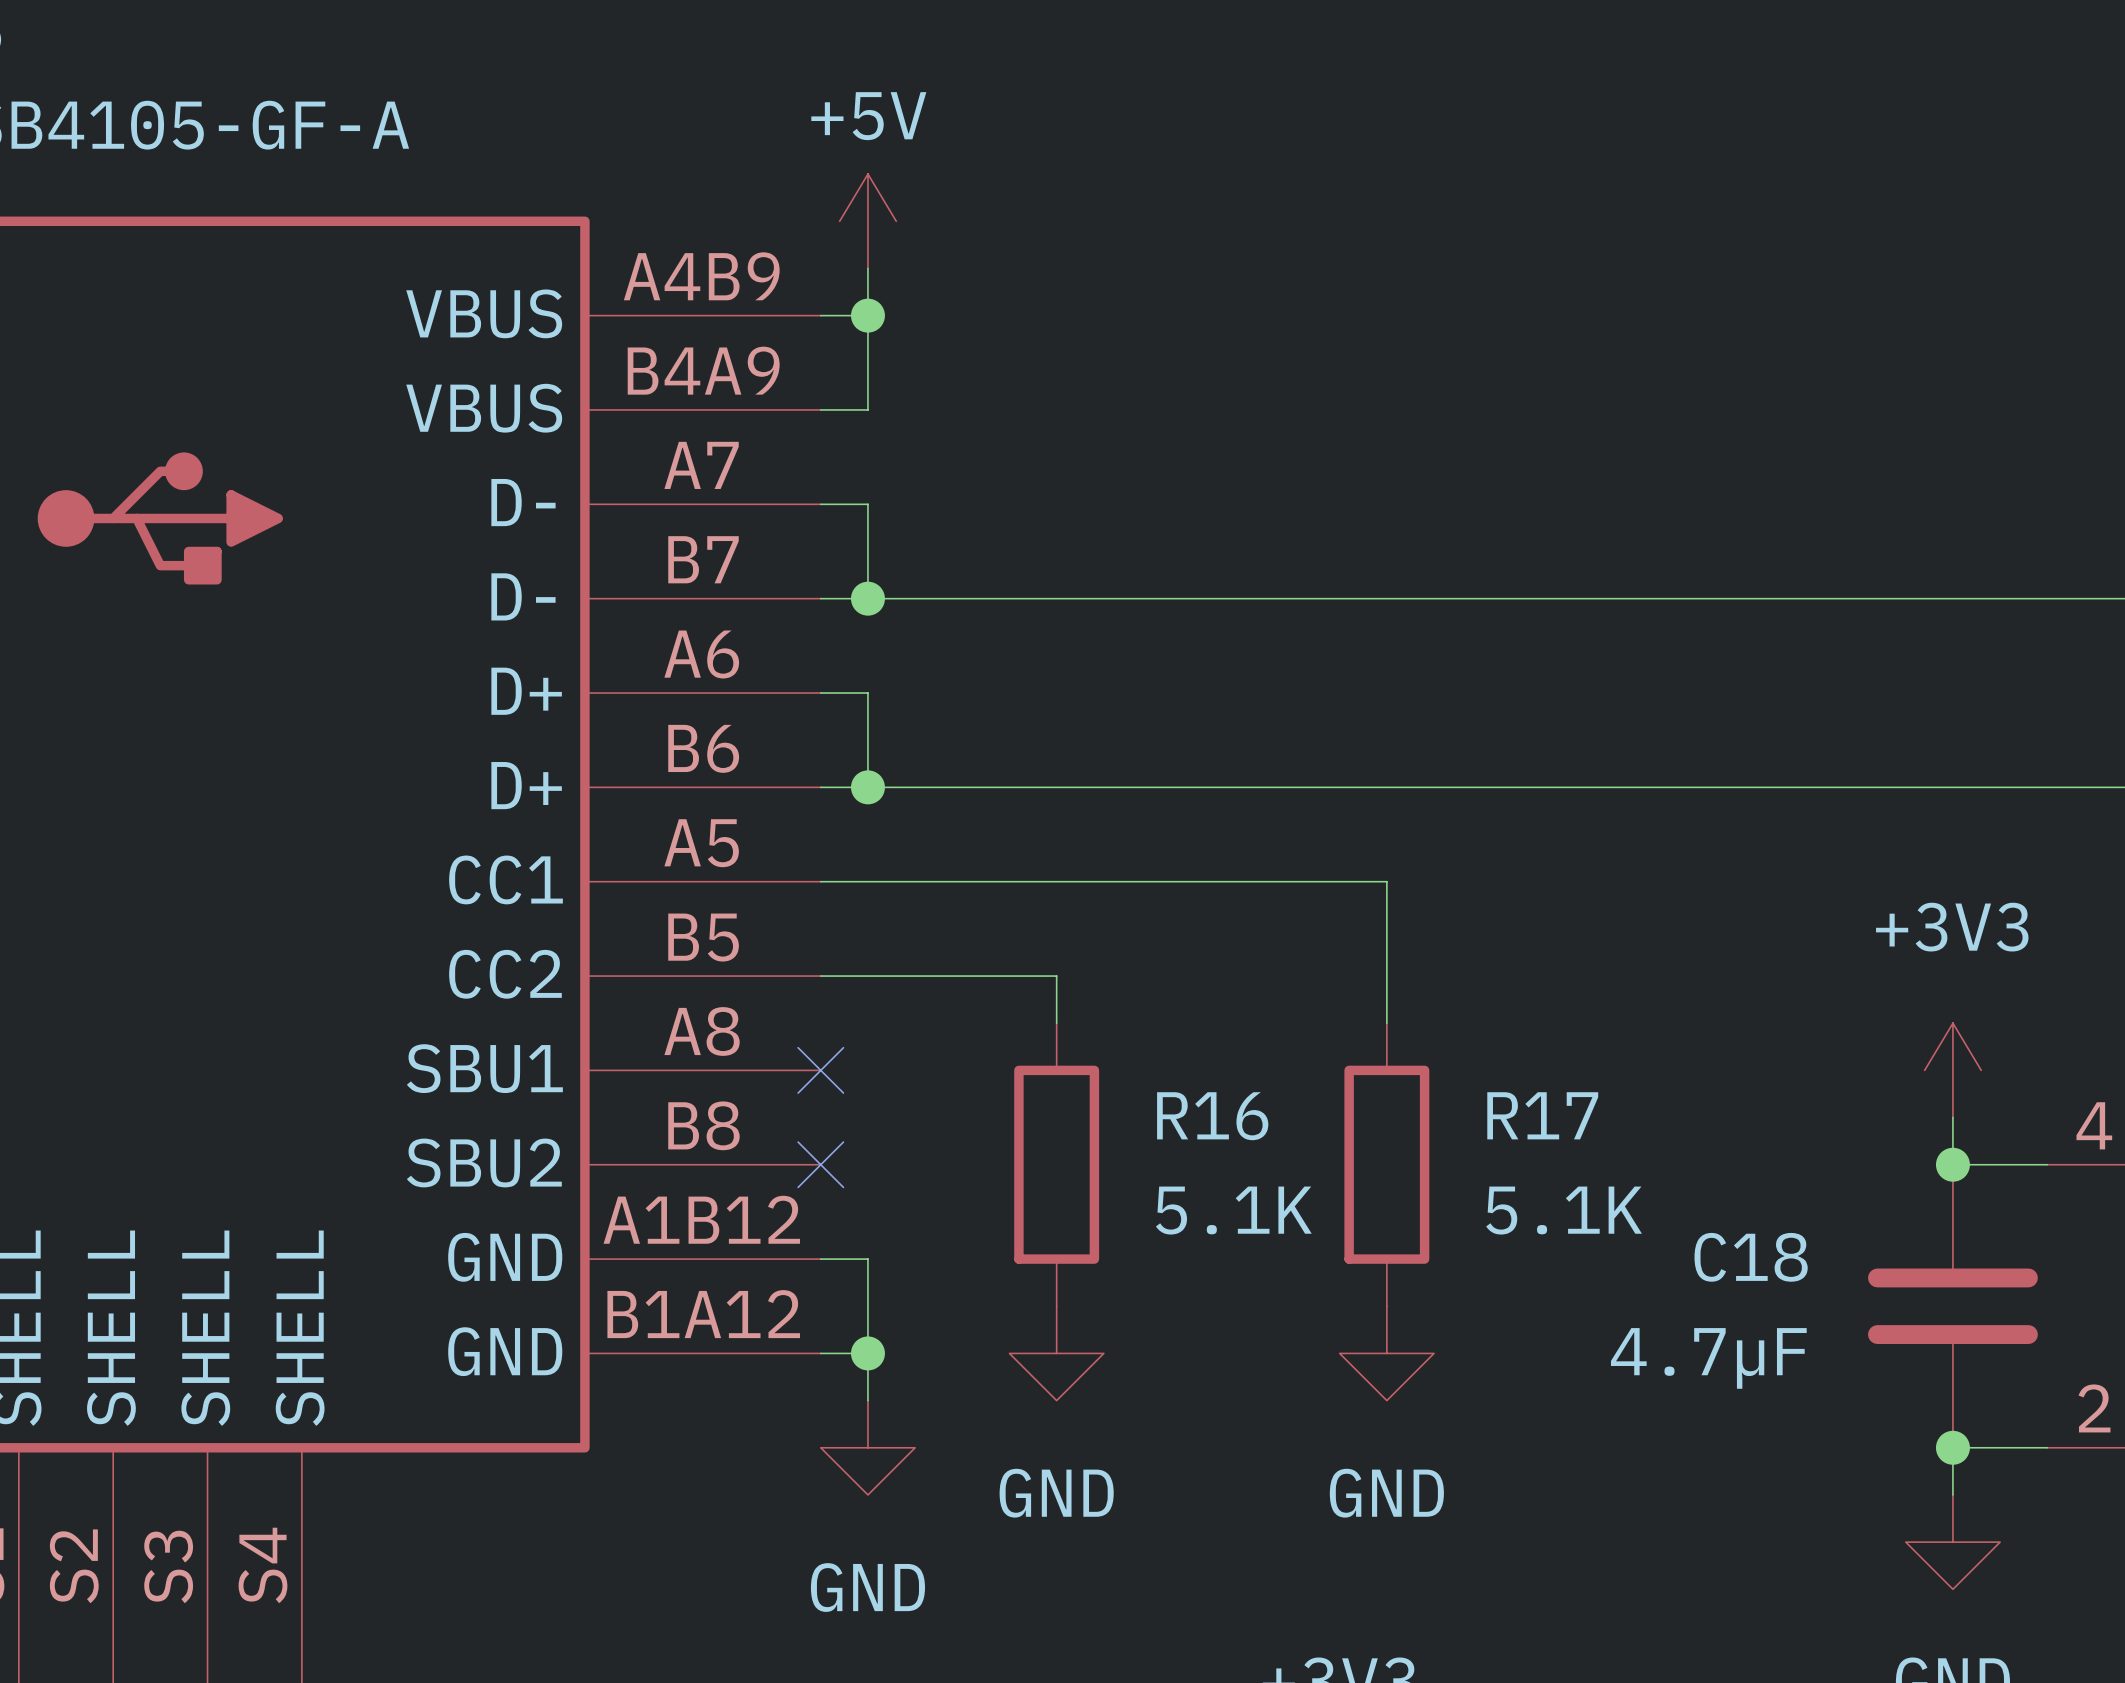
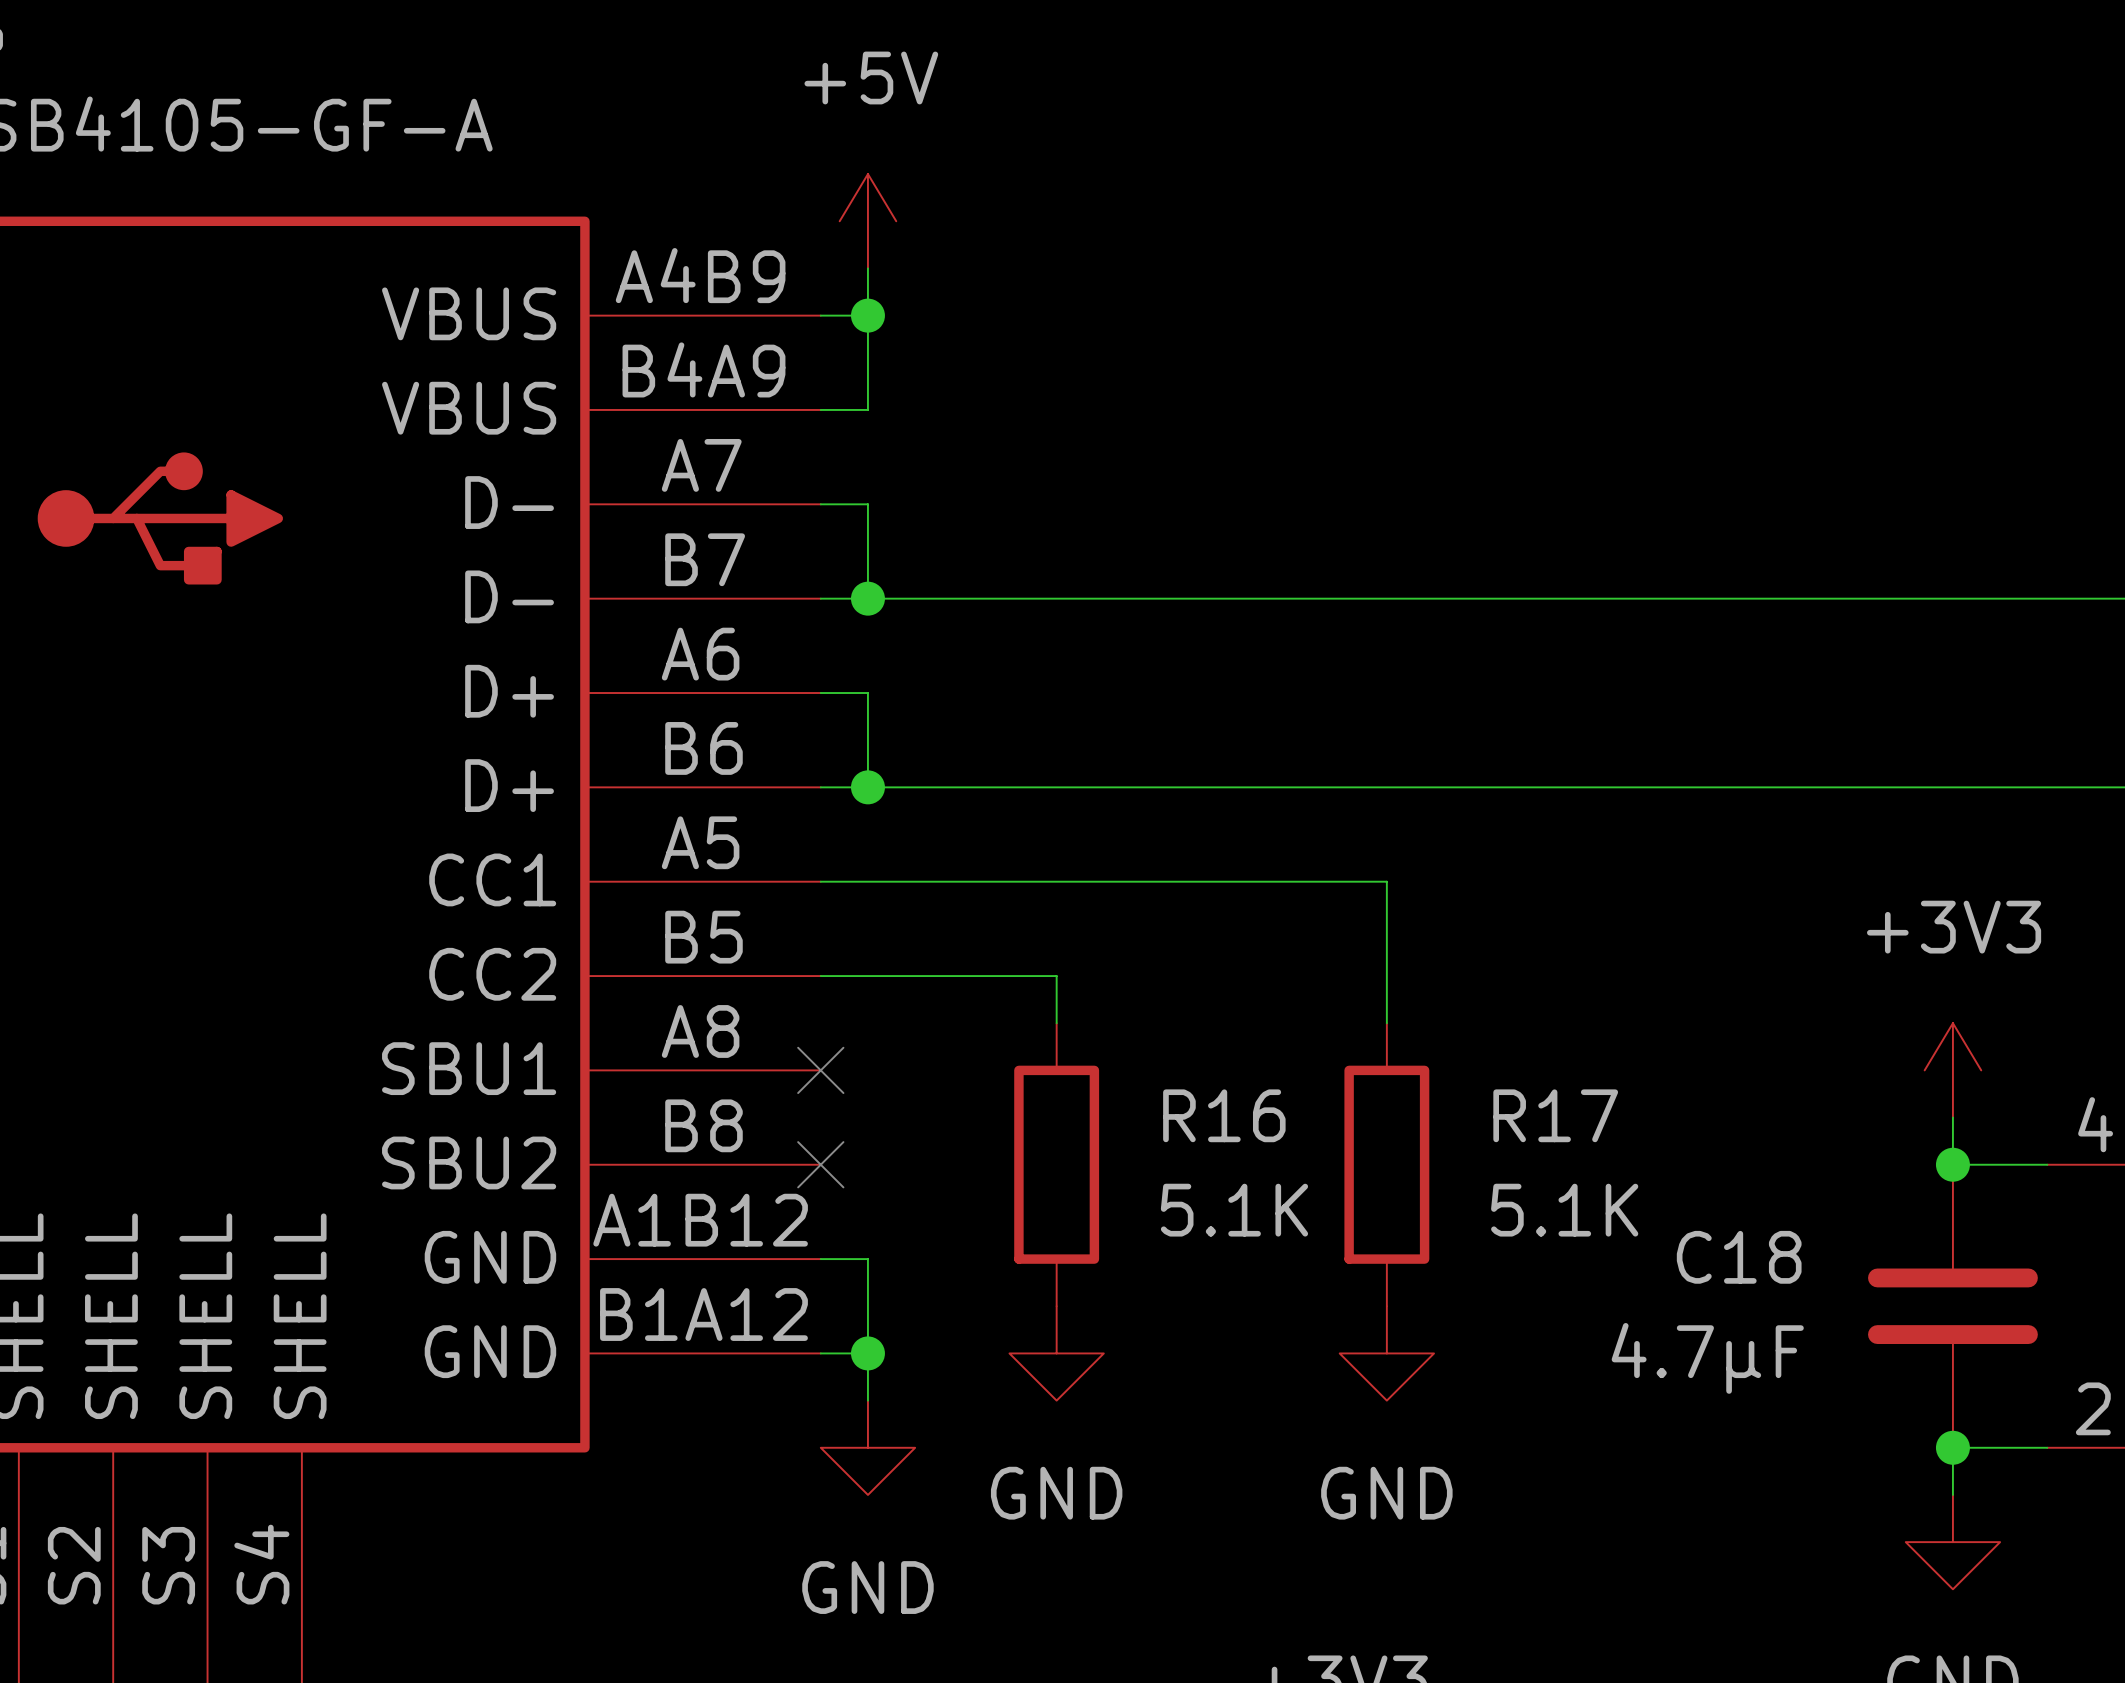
power symbol text position: +5V (868, 116) -> +5V (871, 77)

